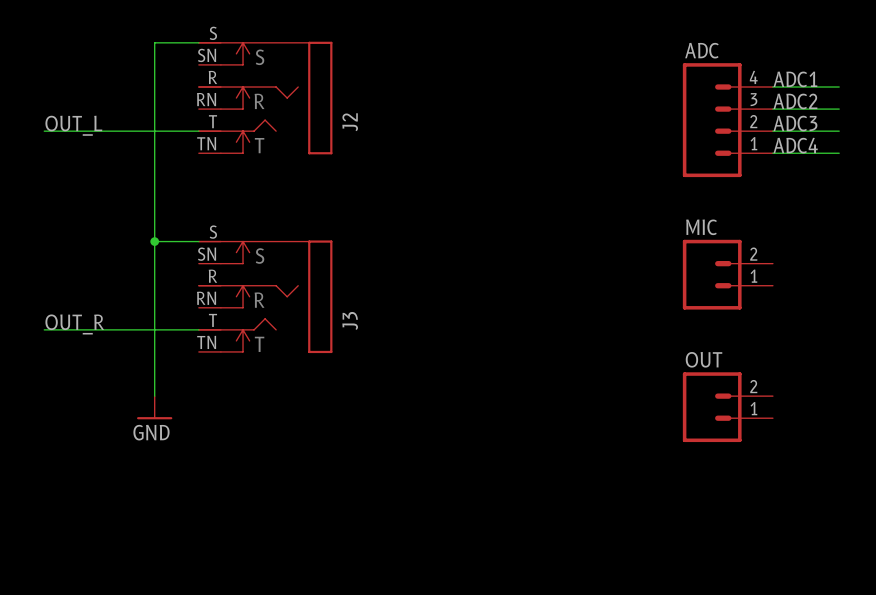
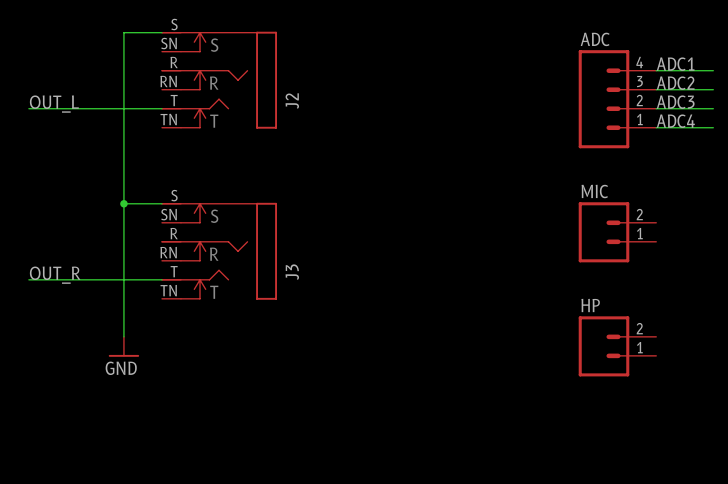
OUT name: OUT (704, 359) -> HP (590, 305)

